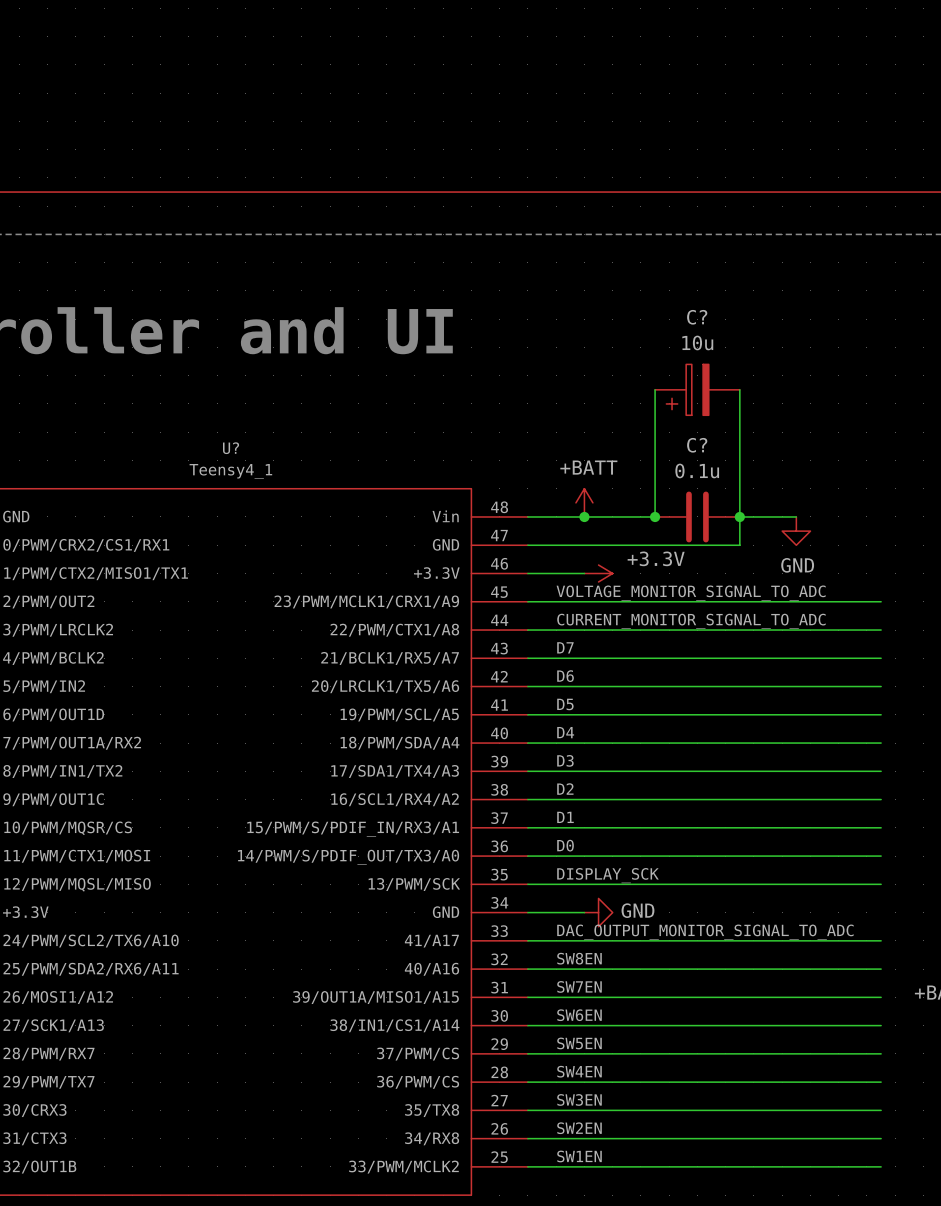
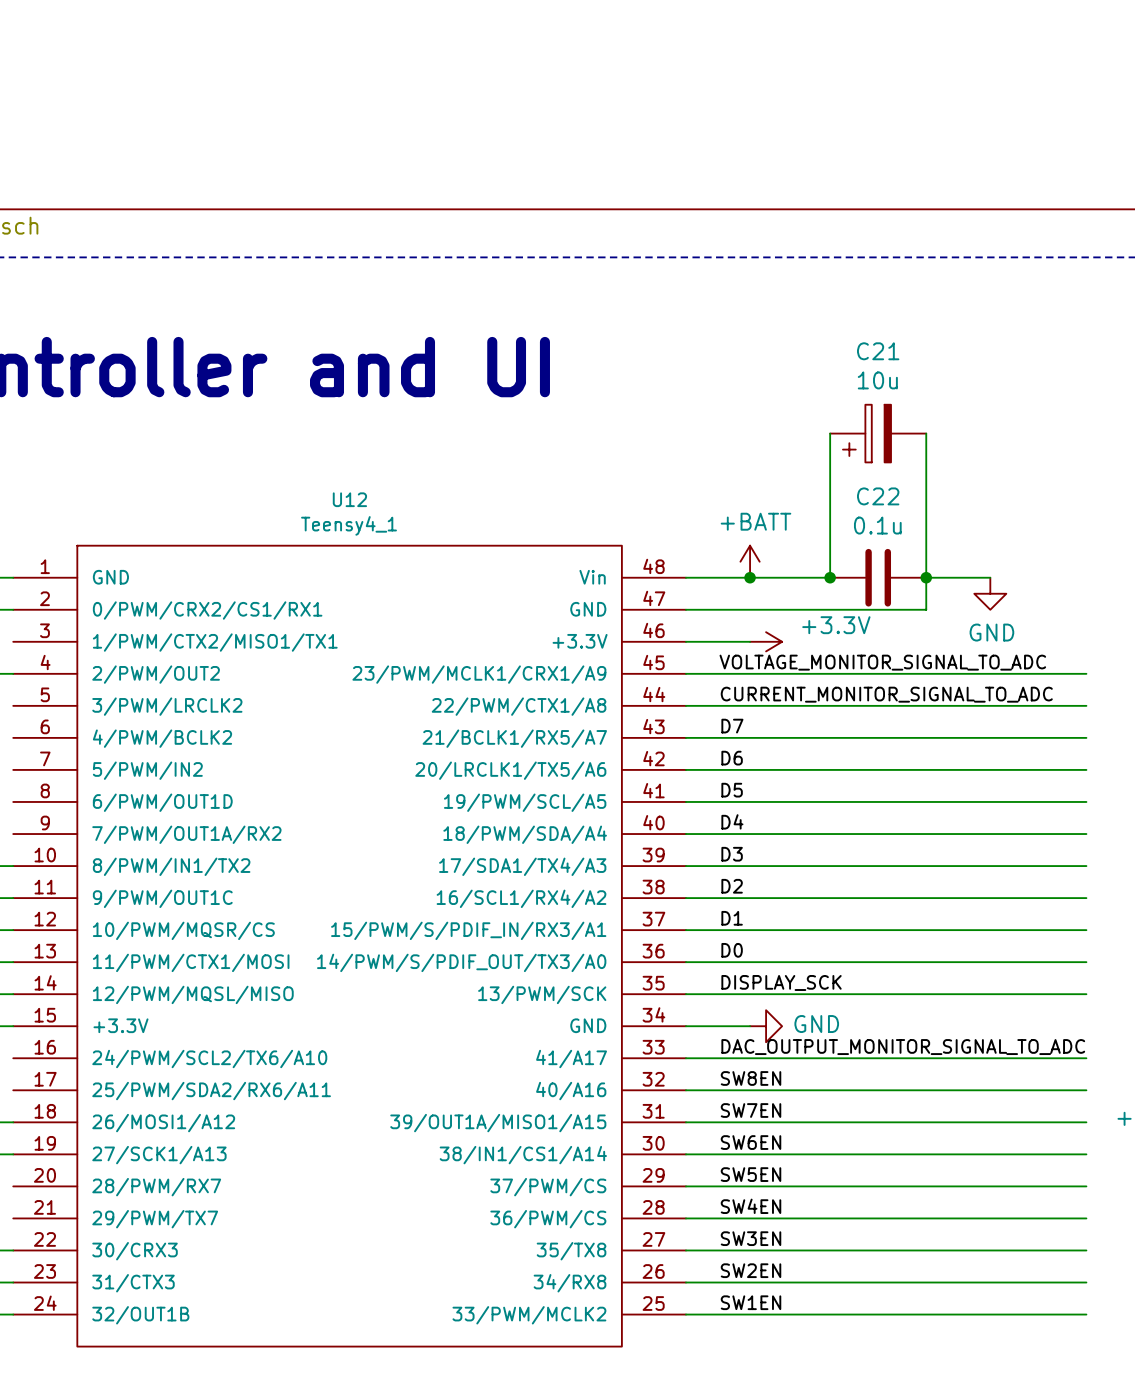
C? name: C? (697, 317) -> C21 (878, 351)
C? name: C? (697, 445) -> C22 (878, 496)
U? name: U? (231, 448) -> U12 (349, 499)

